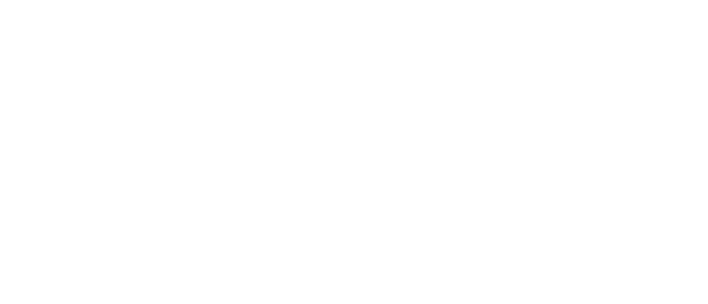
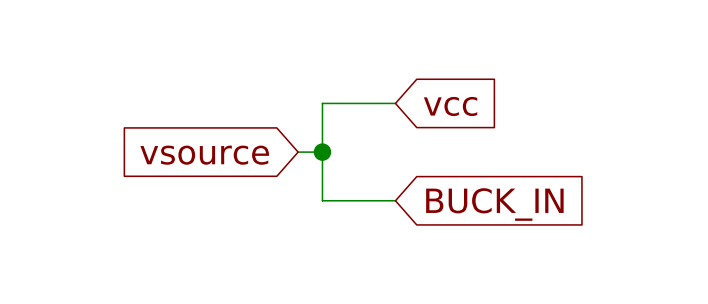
wire: none -> (395, 103) (322, 103) (322, 200) (395, 200)
global label: none -> vcc (450, 106)
wire: none -> (298, 152) (322, 152)
junction: none -> (322, 152)
global label: none -> vsource (204, 155)
global label: none -> BUCK_IN (494, 204)

